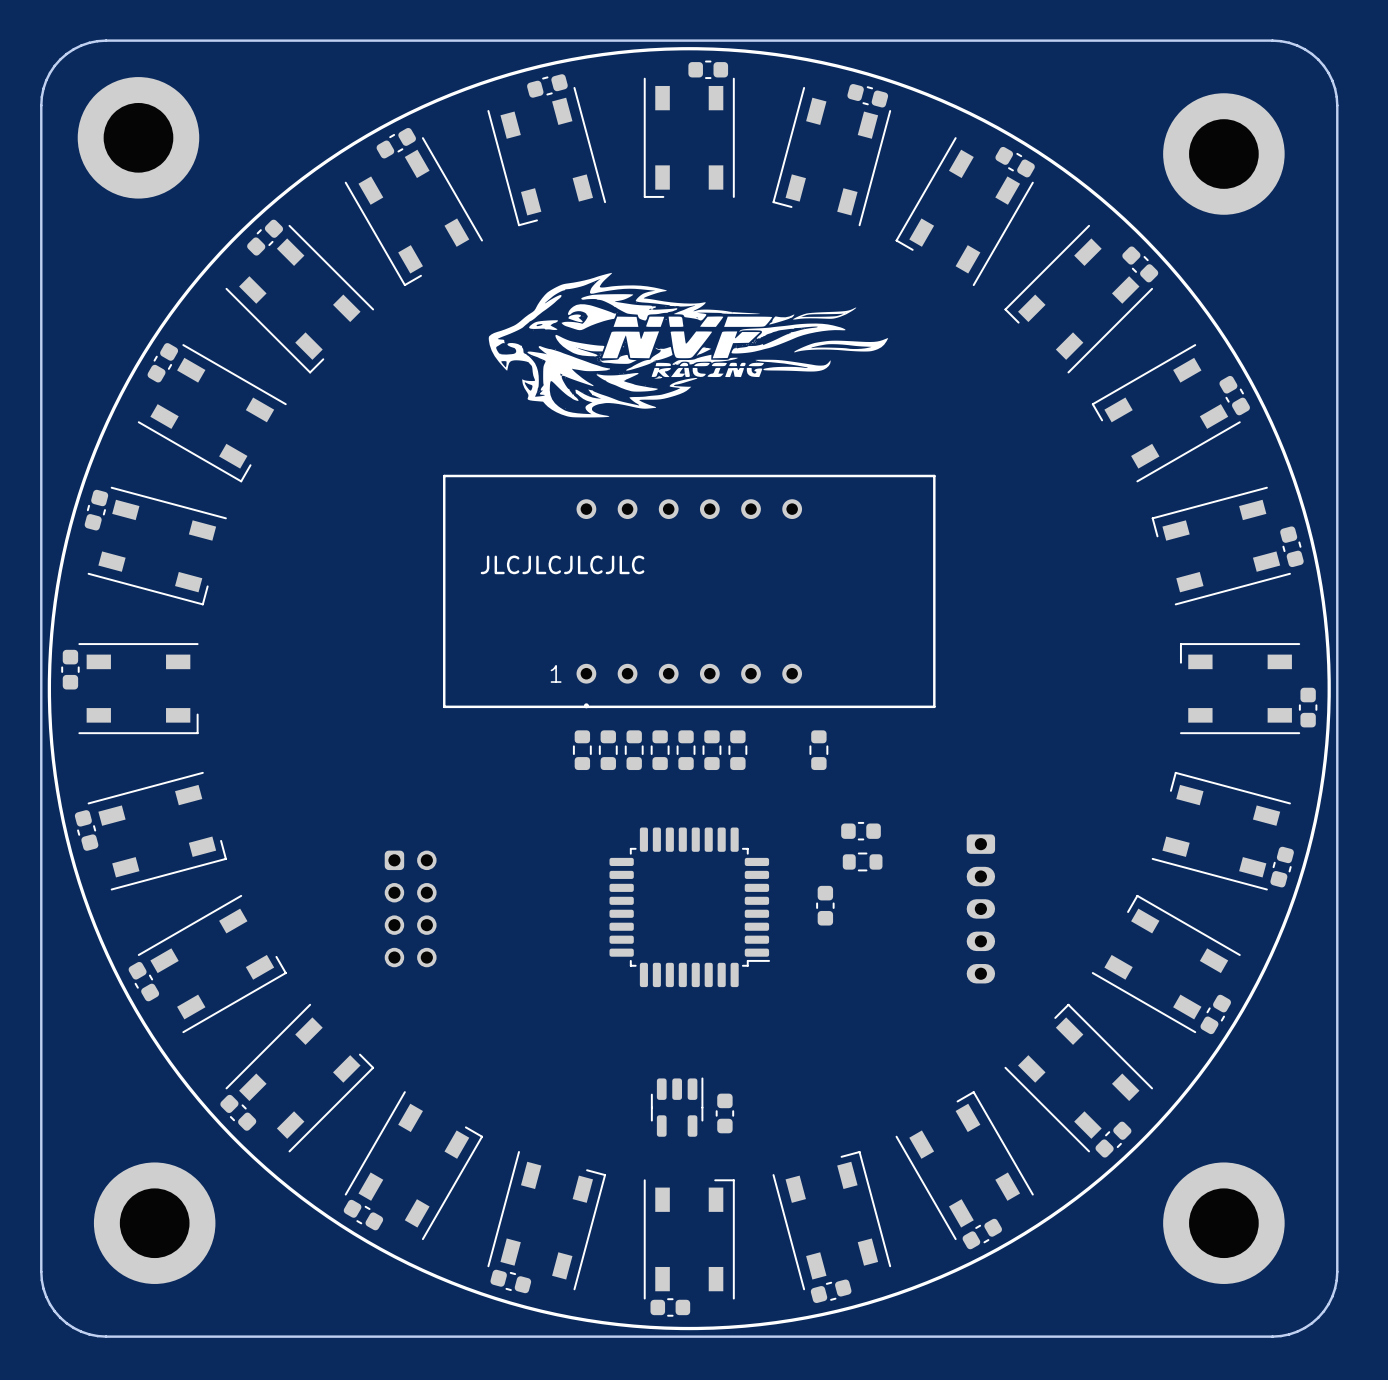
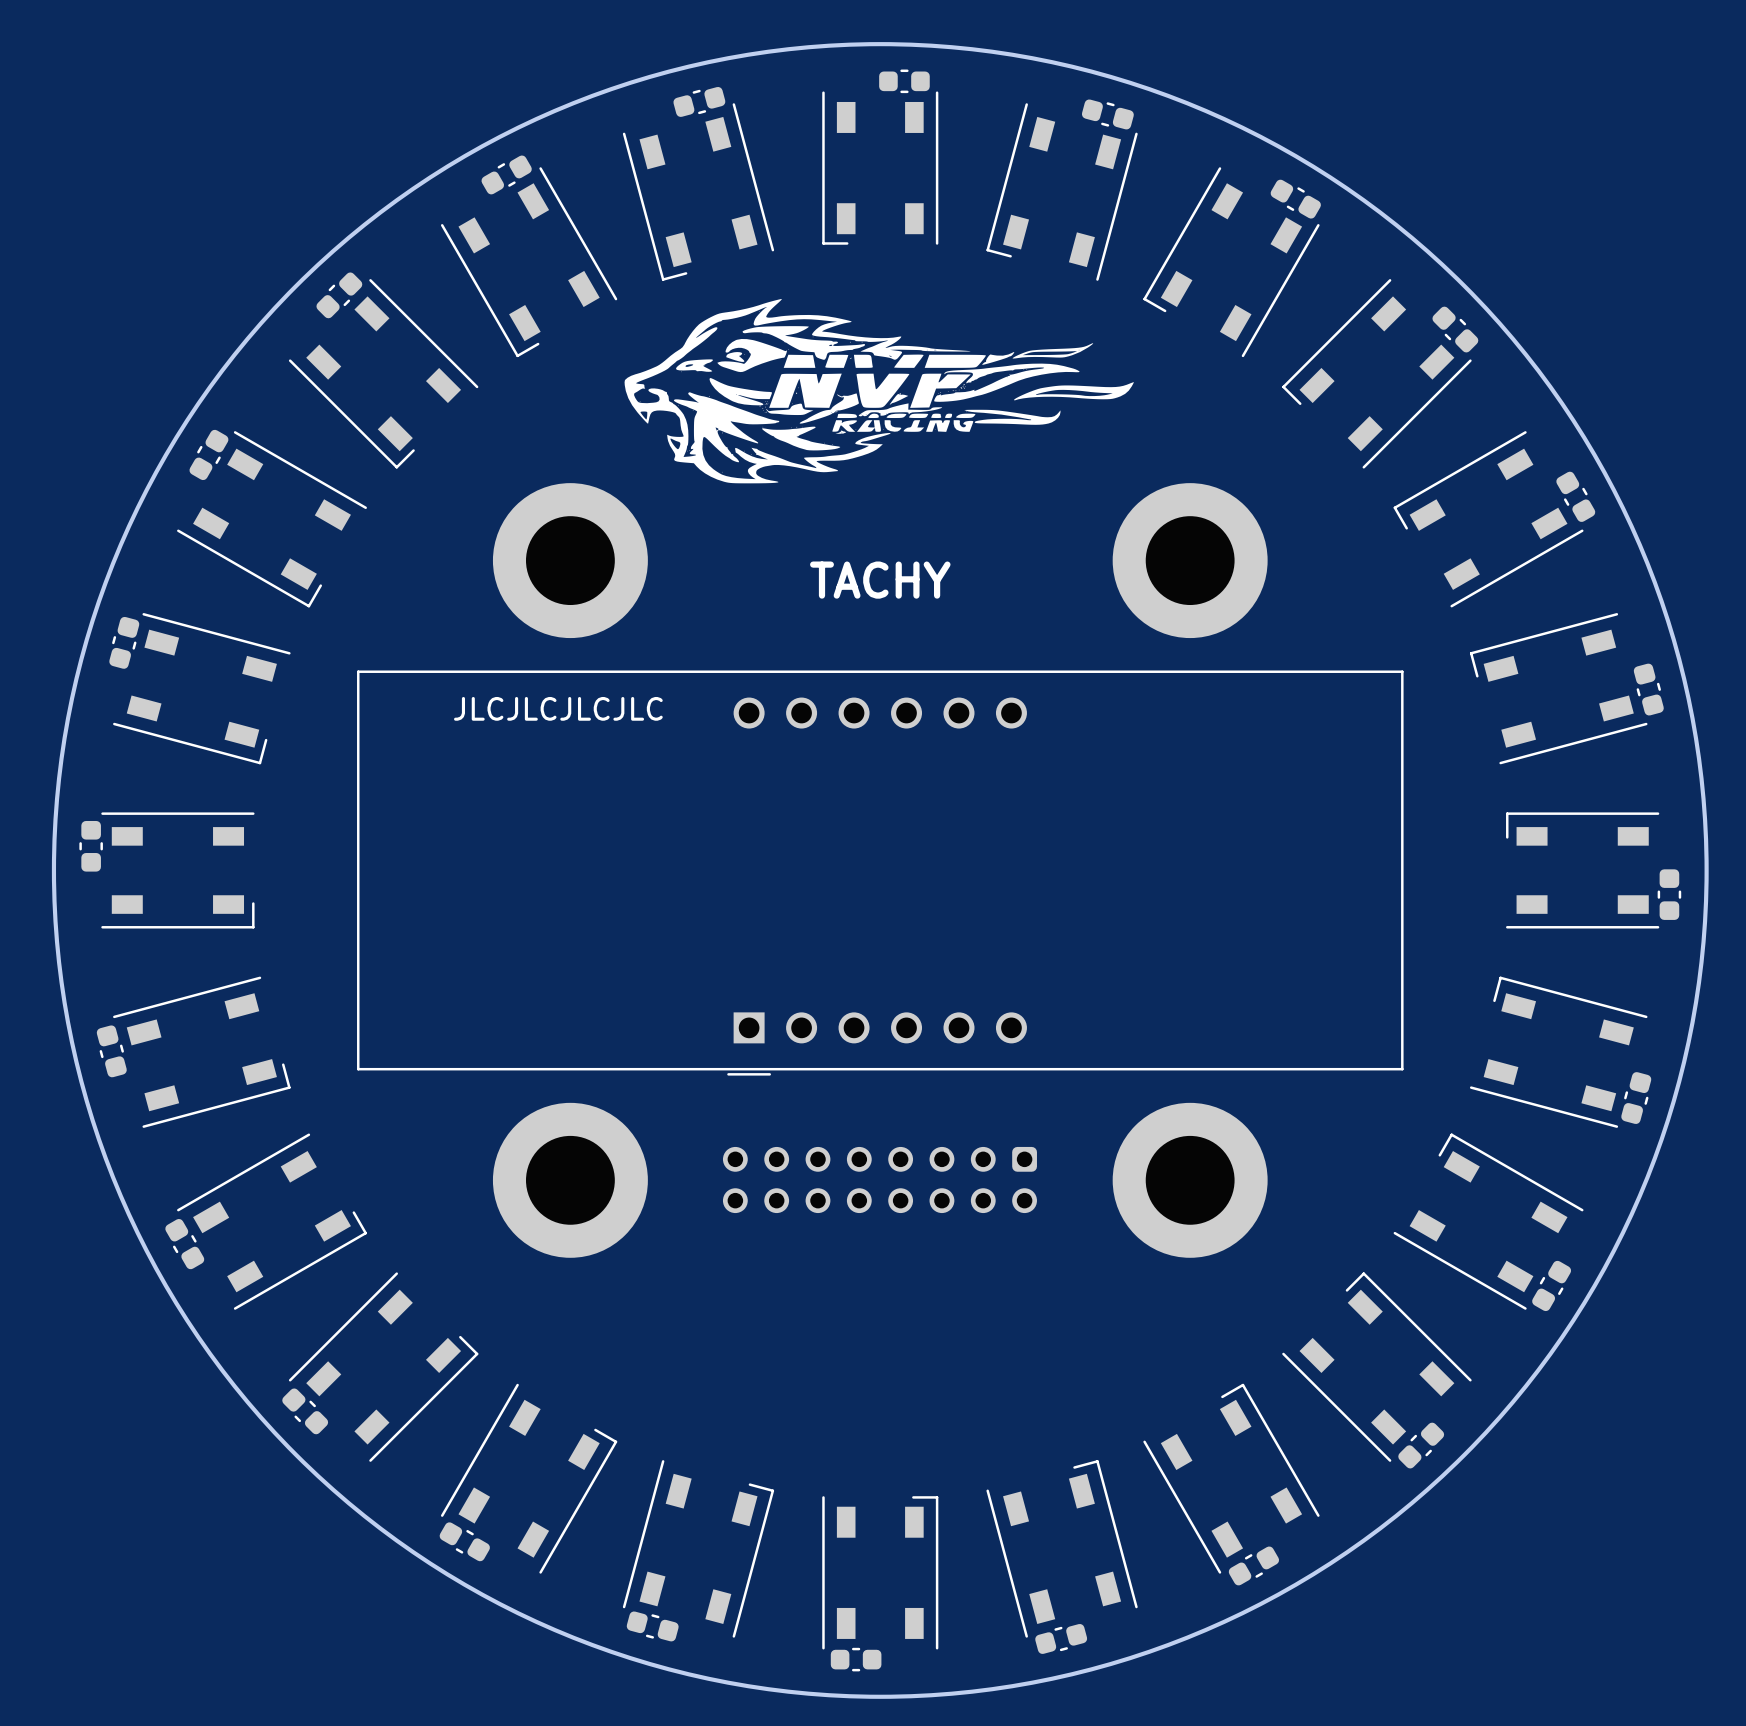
round board edge: none -> [51, 42, 1709, 1699]
board edge: (106, 40) (1272, 40) (1297, 45) (1318, 59) (1332, 80) (1337, 105) (1337, 1271) (1332, 1296) (1318, 1317) (1297, 1331) (1272, 1336) (106, 1336) (81, 1331) (60, 1317) (46, 1296) (41, 1271) (41, 105) (46, 80) (60, 59) (81, 45) (106, 40) -> none
drawing: [47, 47, 1331, 1331] -> none
part: (138, 137) -> none
part: (1223, 154) -> none
drawing position: (688, 345) -> (879, 391)
part: none -> (570, 560)
part: none -> (1190, 560)
text: none -> TACHY (880, 580)
text position: JLCJLCJLCJLC (562, 564) -> JLCJLCJLCJLC (558, 708)
part: (689, 591) -> none
part: none -> (880, 873)
part: (582, 750) -> none
part: (608, 750) -> none
part: (634, 750) -> none
part: (660, 750) -> none
part: (686, 750) -> none
part: (711, 750) -> none
part: (737, 750) -> none
part: (818, 750) -> none
part: (861, 831) -> none
part: (862, 861) -> none
part: (825, 905) -> none
part: (689, 907) -> none
part: (410, 908) -> none
part: (980, 908) -> none
part: none -> (570, 1180)
part: none -> (879, 1180)
part: none -> (1190, 1180)
part: (677, 1107) -> none
part: (724, 1113) -> none
part: (154, 1223) -> none
part: (1223, 1223) -> none

